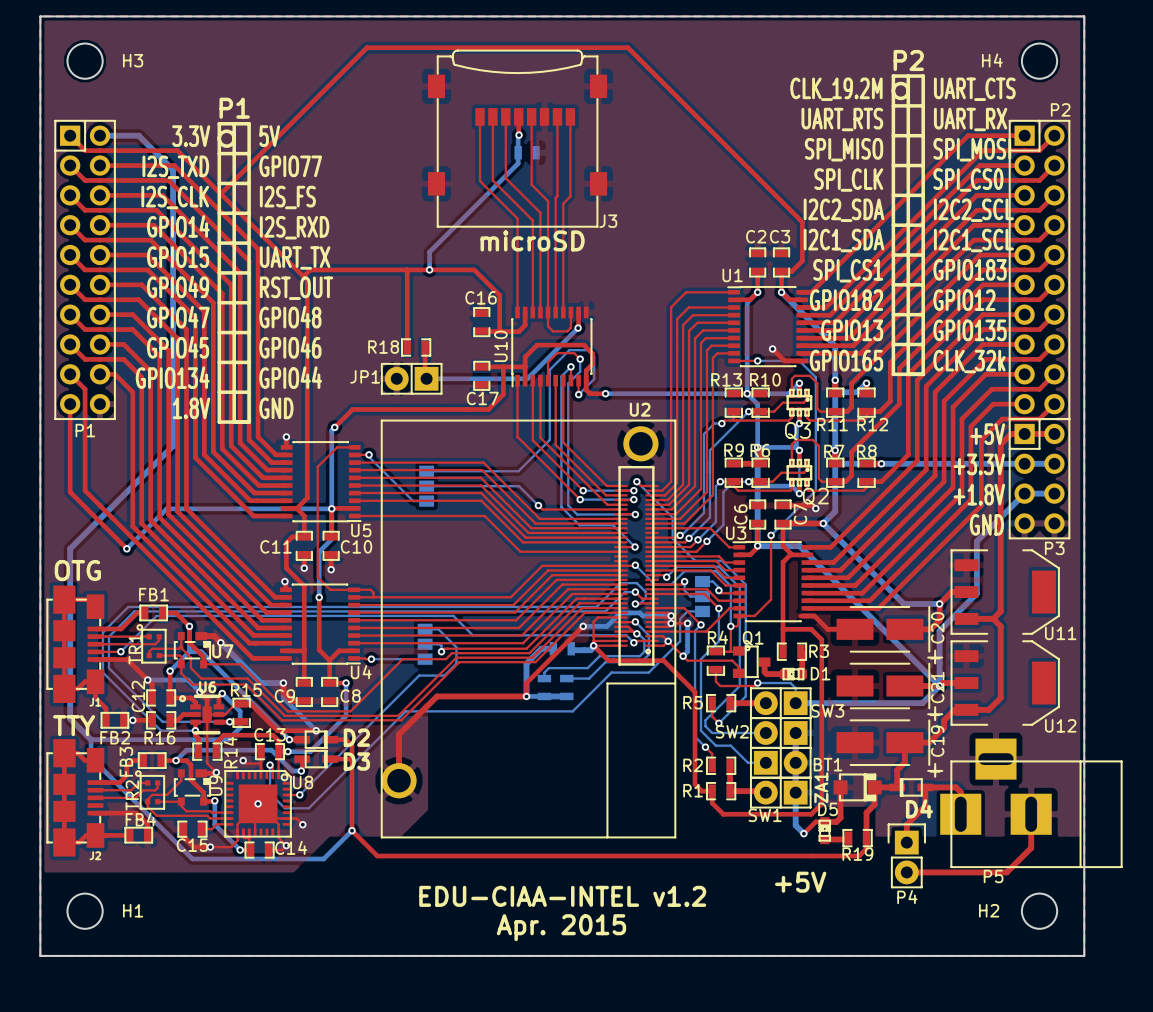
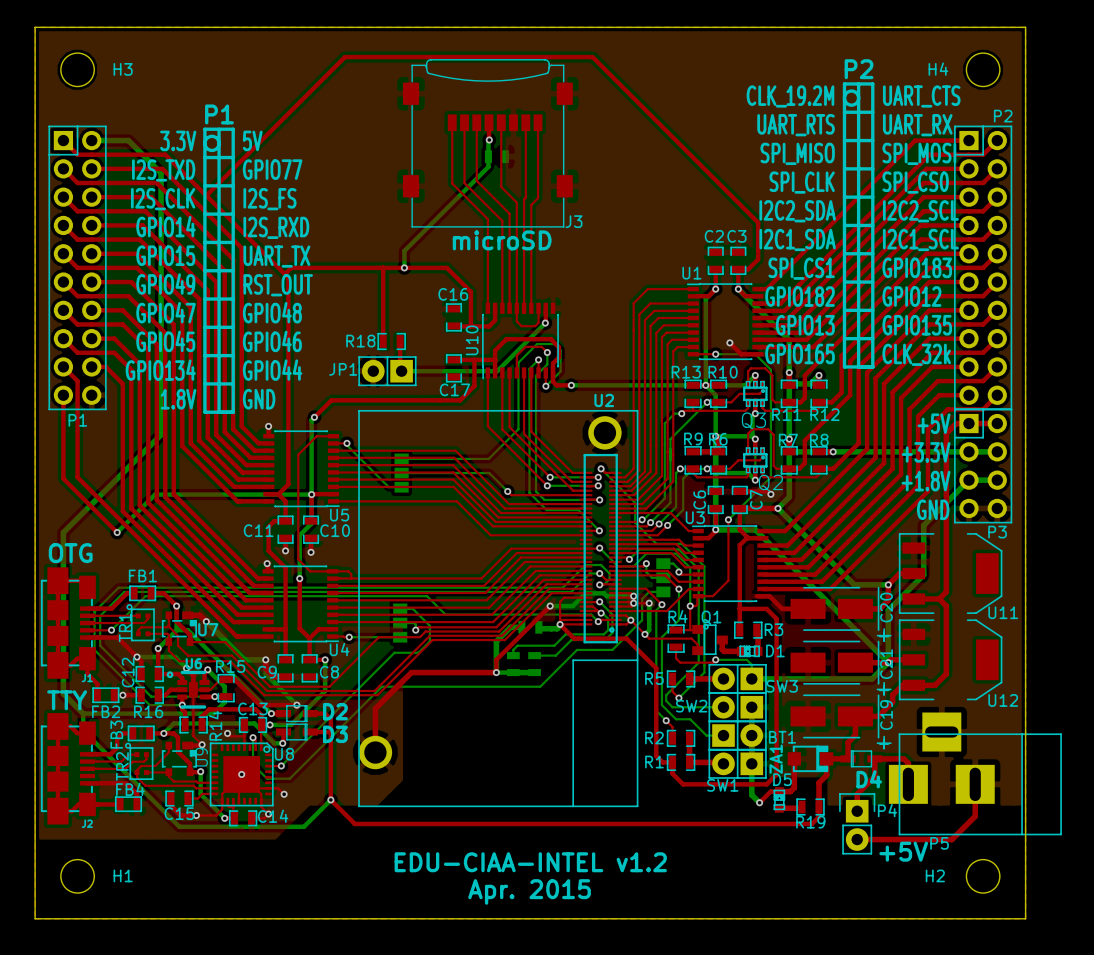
text position: +5V (800, 882) -> +5V (903, 851)
P4 name position: P4 (907, 897) -> P4 (887, 810)

